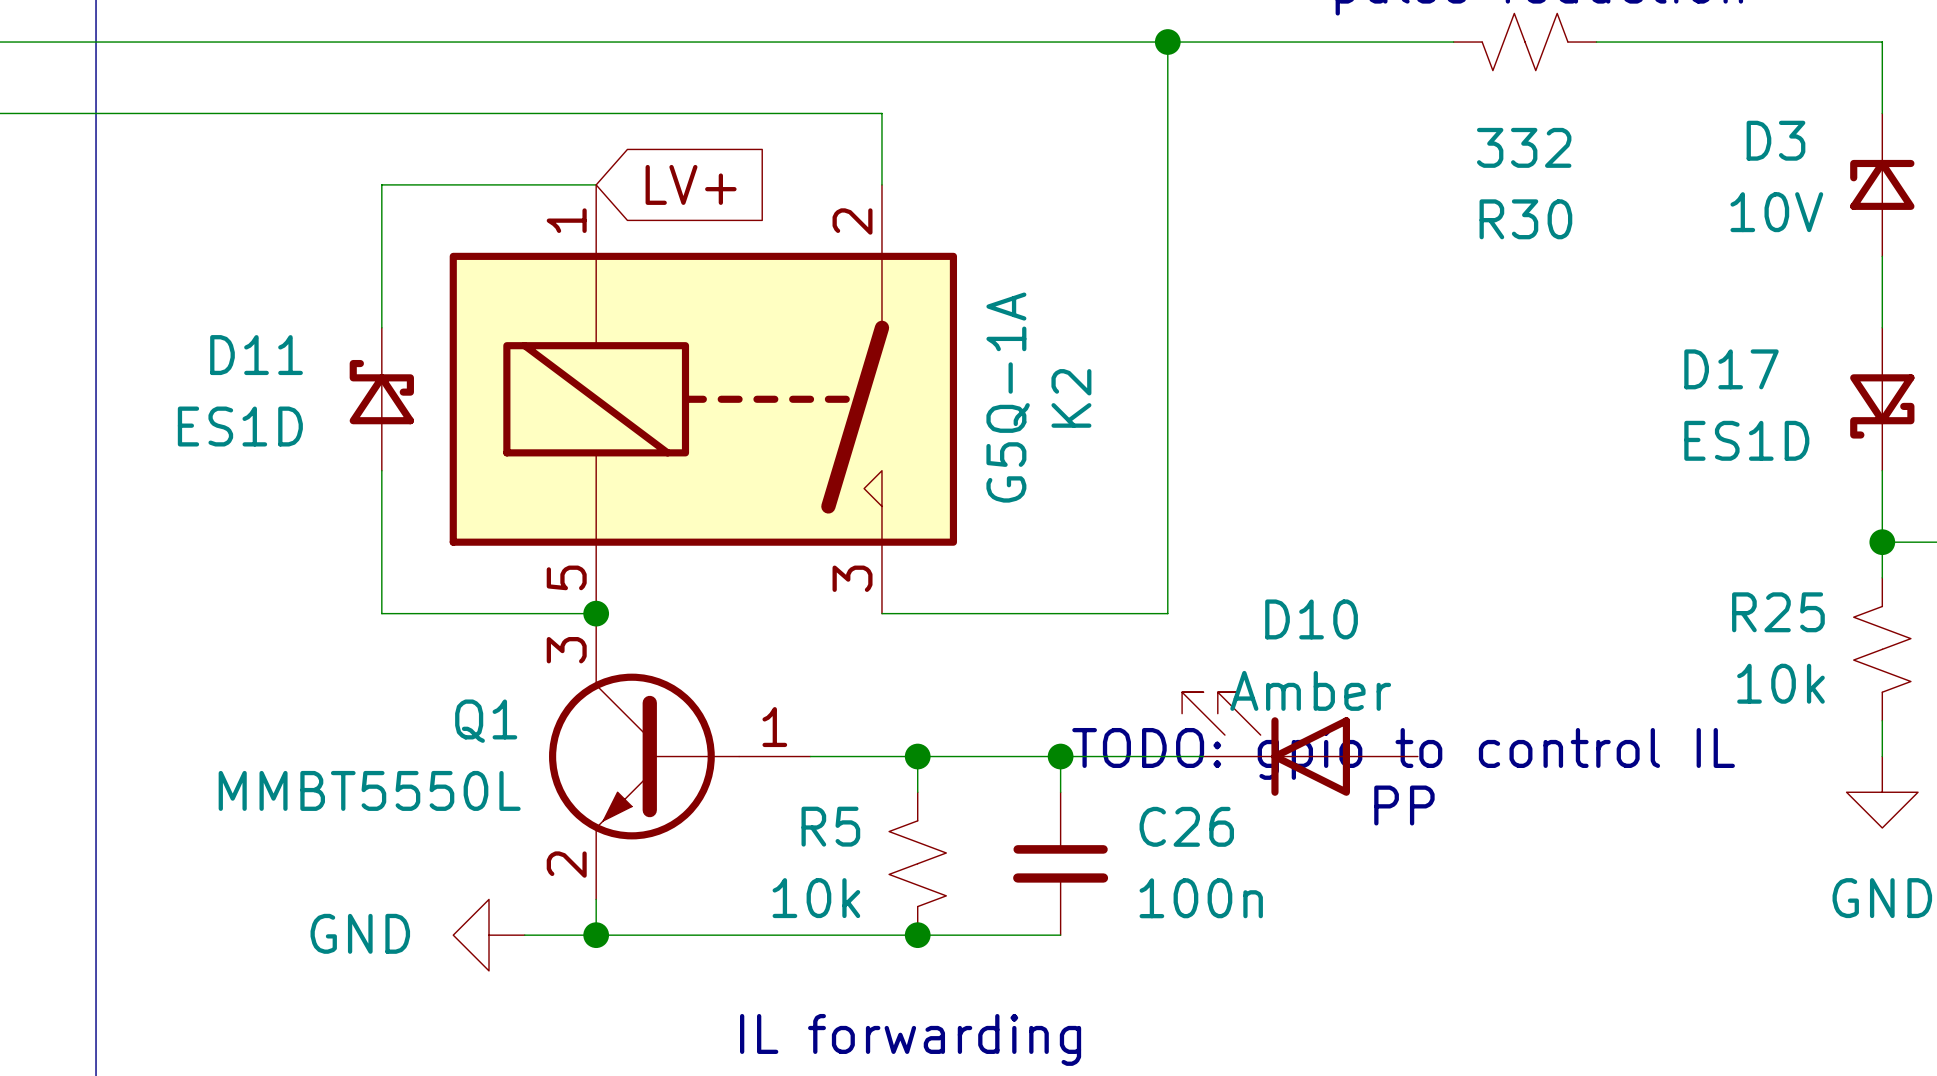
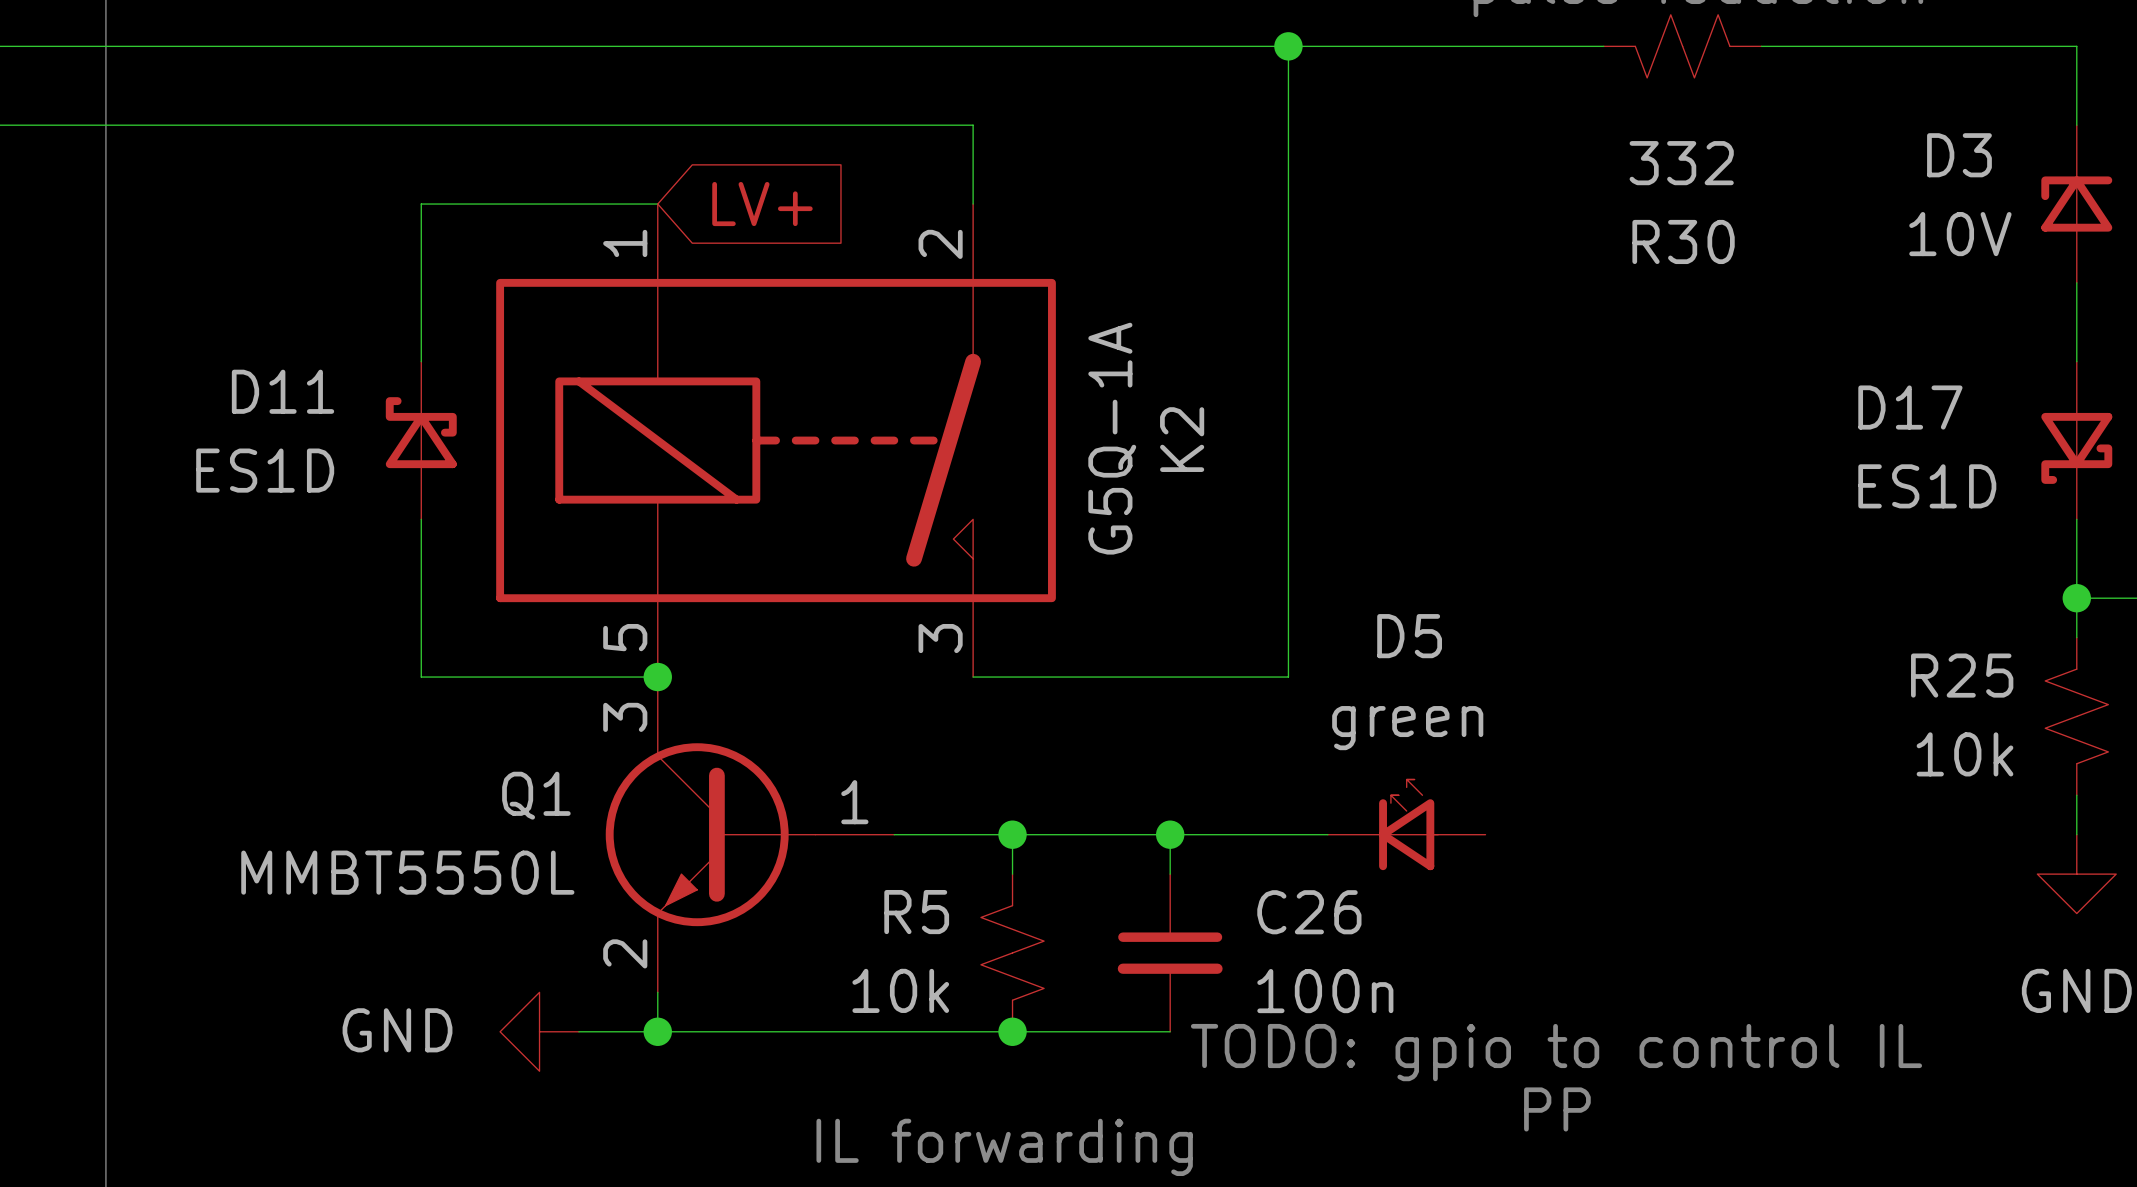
D10: Amber (1299, 744) -> none
D5: none -> green (1406, 824)
text position: TODO: gpio to control IL (1403, 753) -> TODO: gpio to control IL (1556, 1052)
text position: PP (1404, 805) -> PP (1557, 1109)

